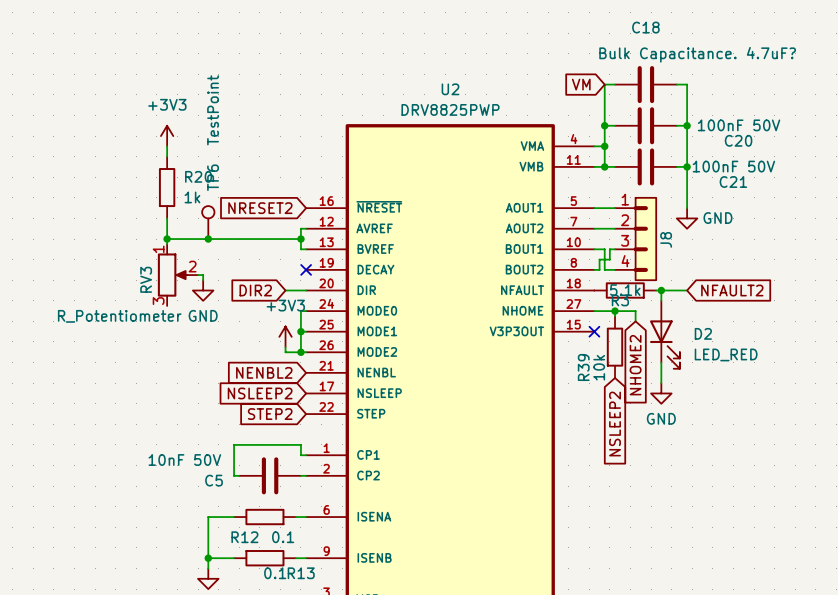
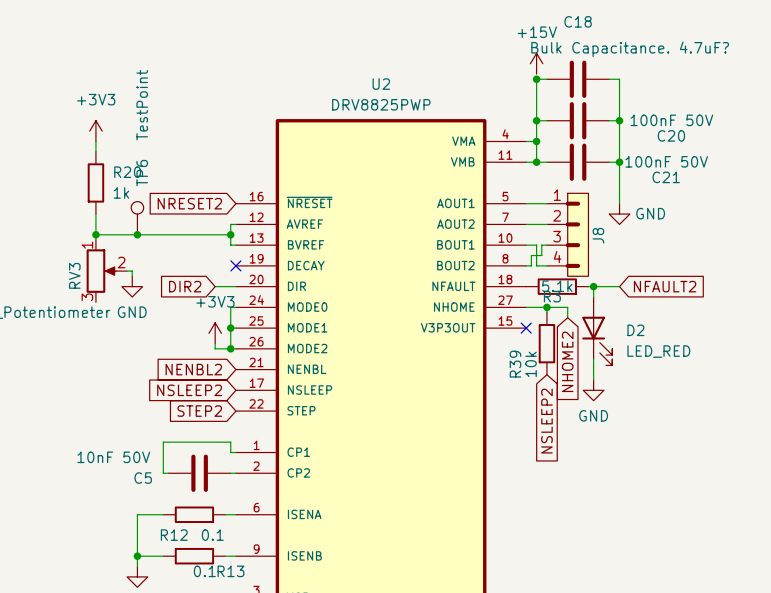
power symbol: none -> +15V (536, 63)
global label: VM (581, 84) -> none
junction: none -> (536, 79)

